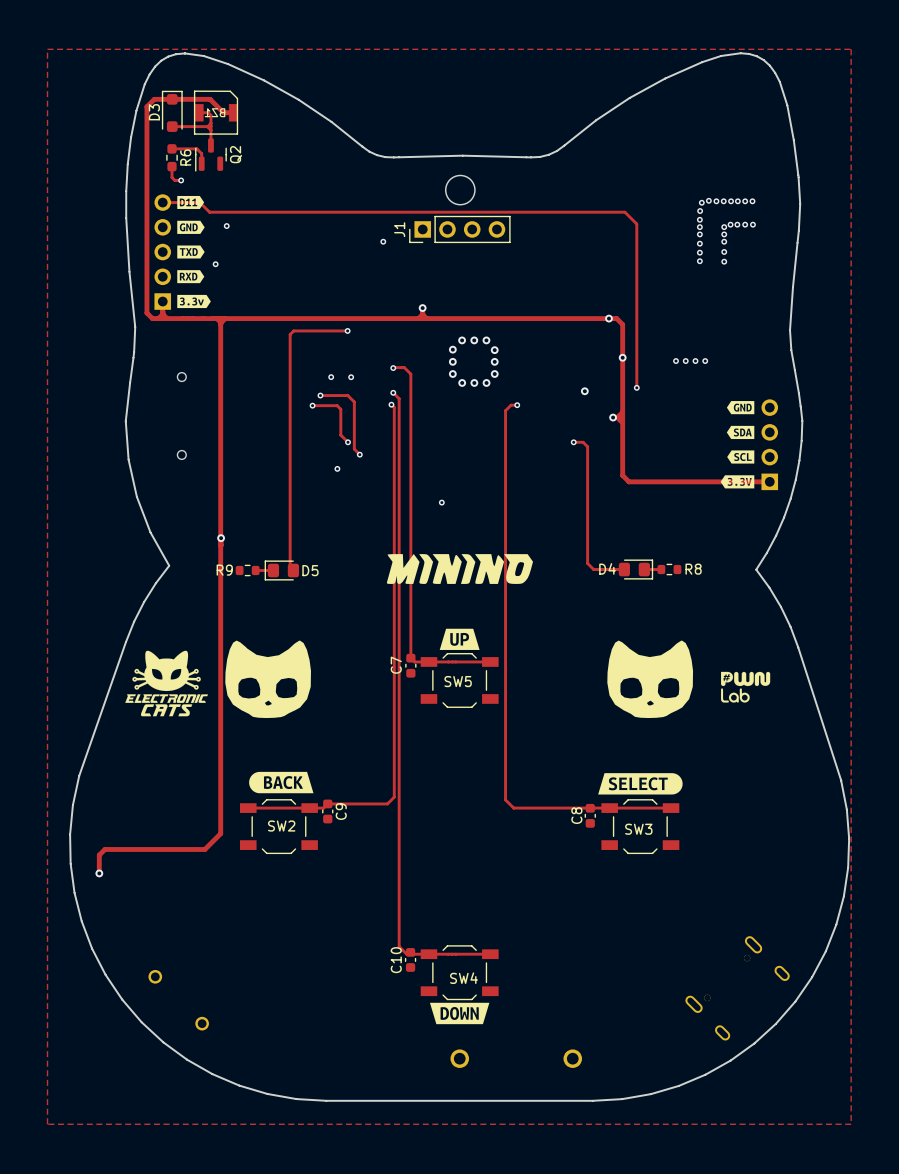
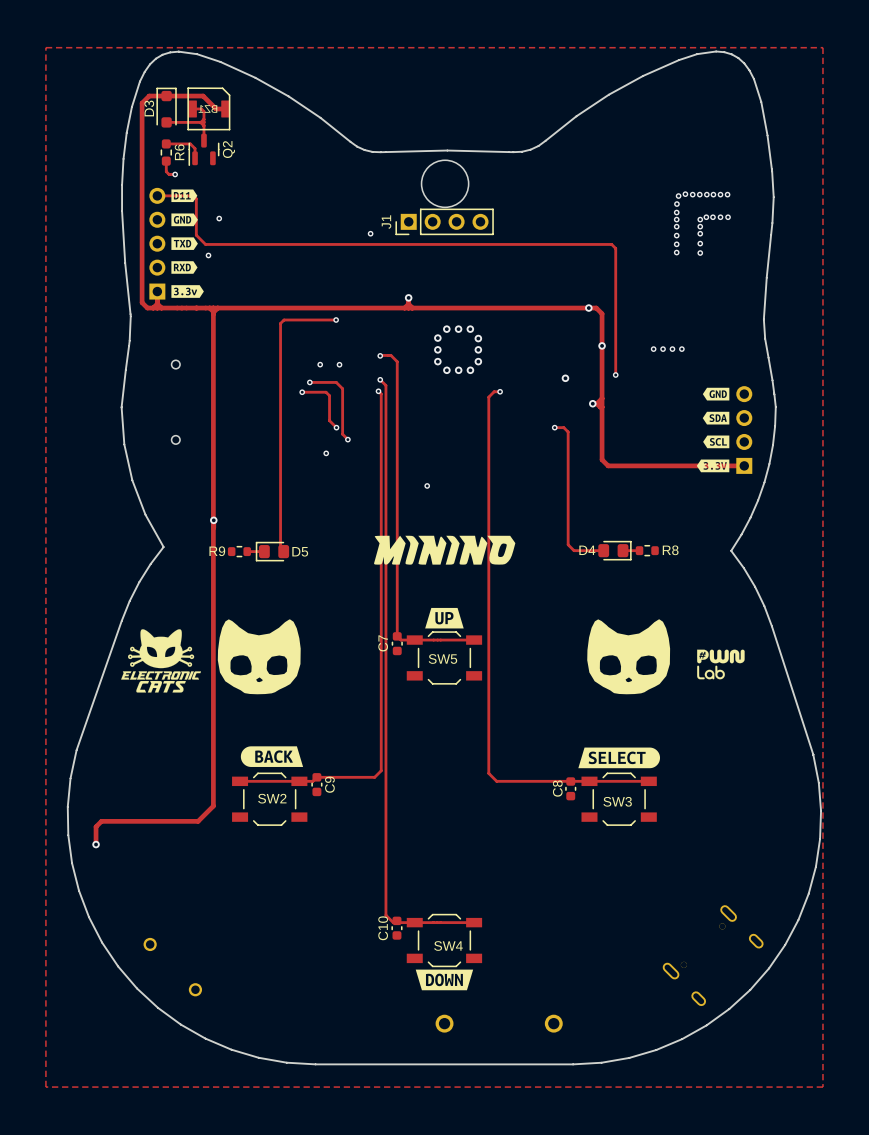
round board edge size: [444, 174, 476, 206] -> [420, 159, 470, 209]
track: (203, 205) (209, 212) (624, 212) (636, 224) (636, 256) -> (196, 198) (196, 235) (205, 244) (611, 244) (615, 248)

